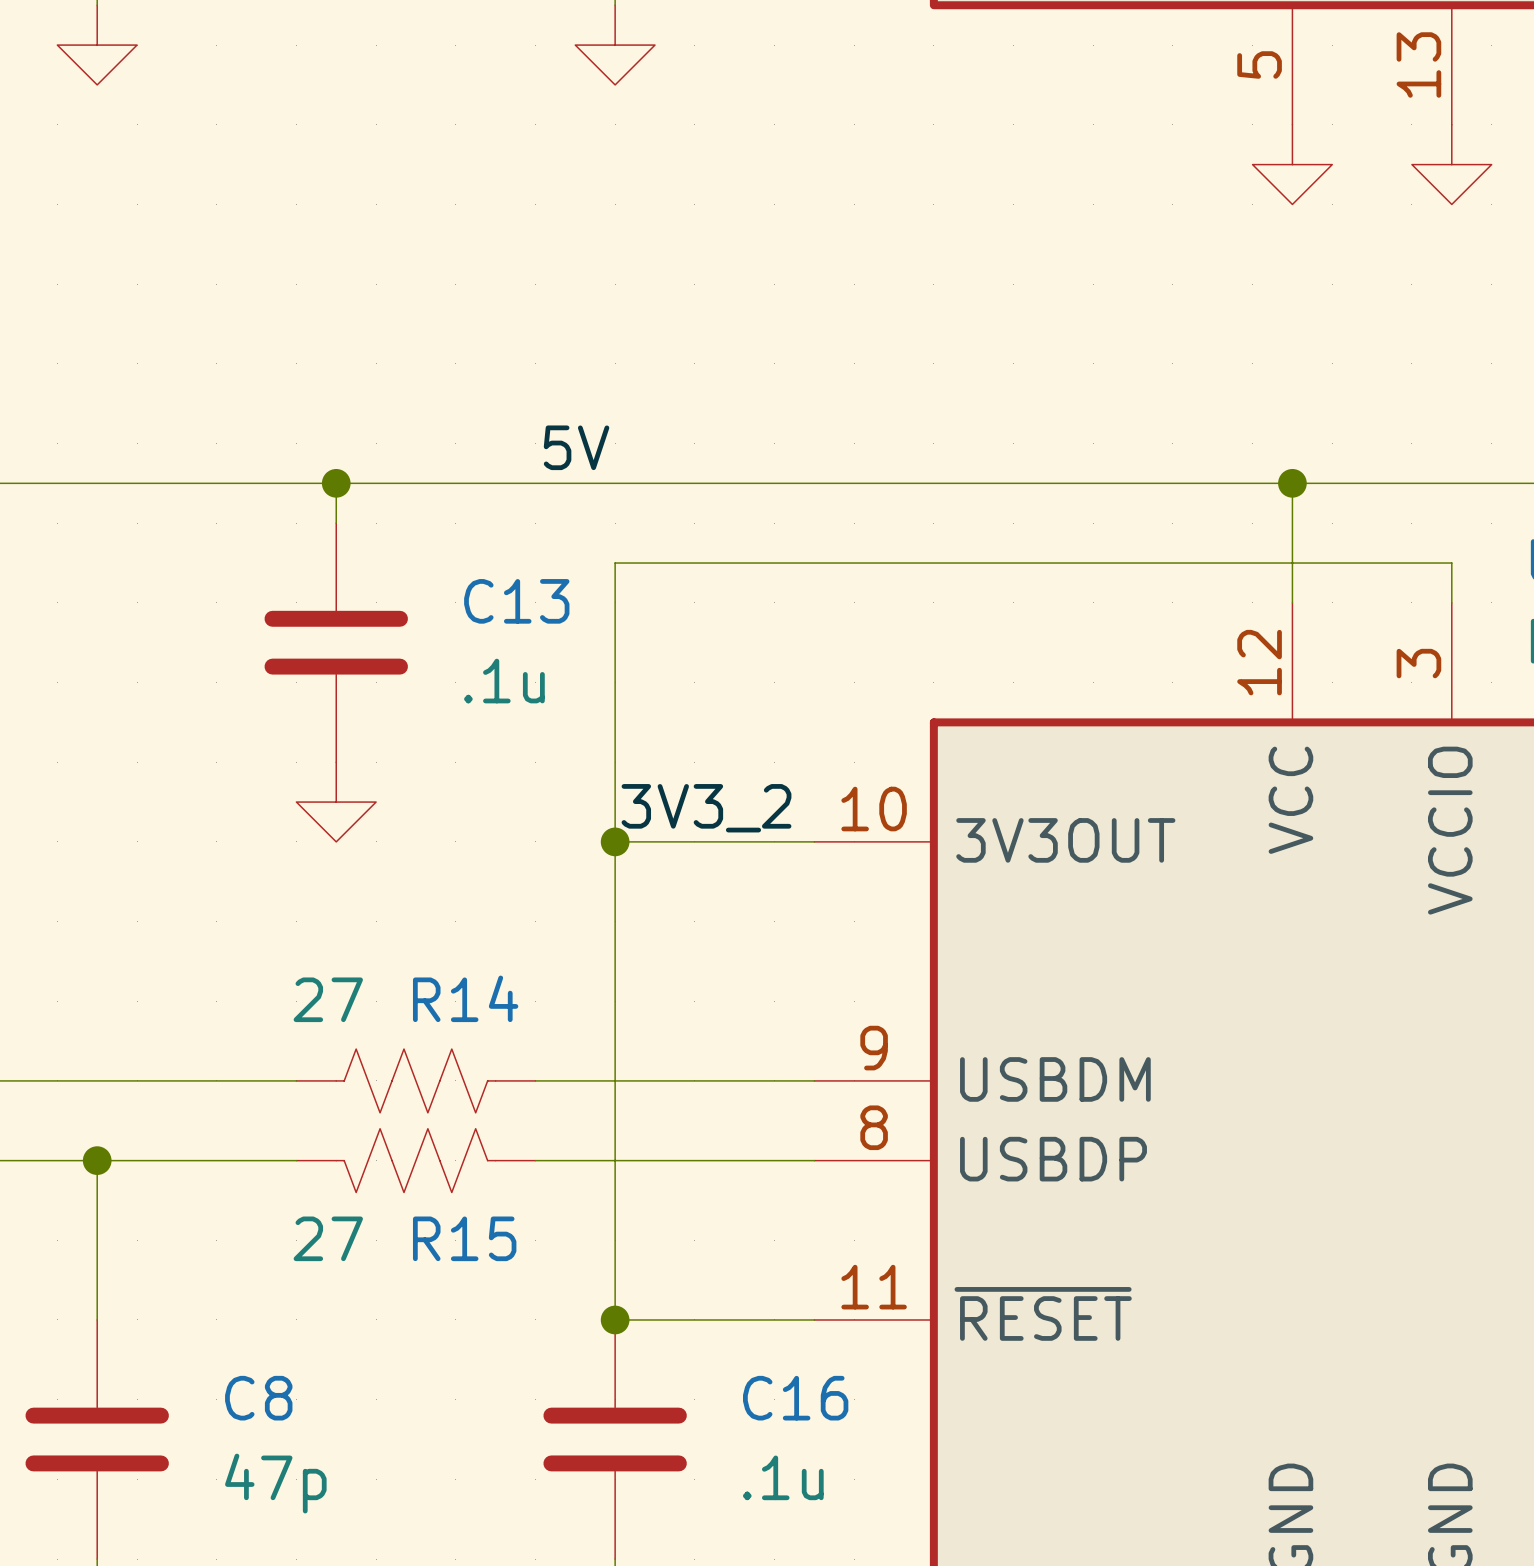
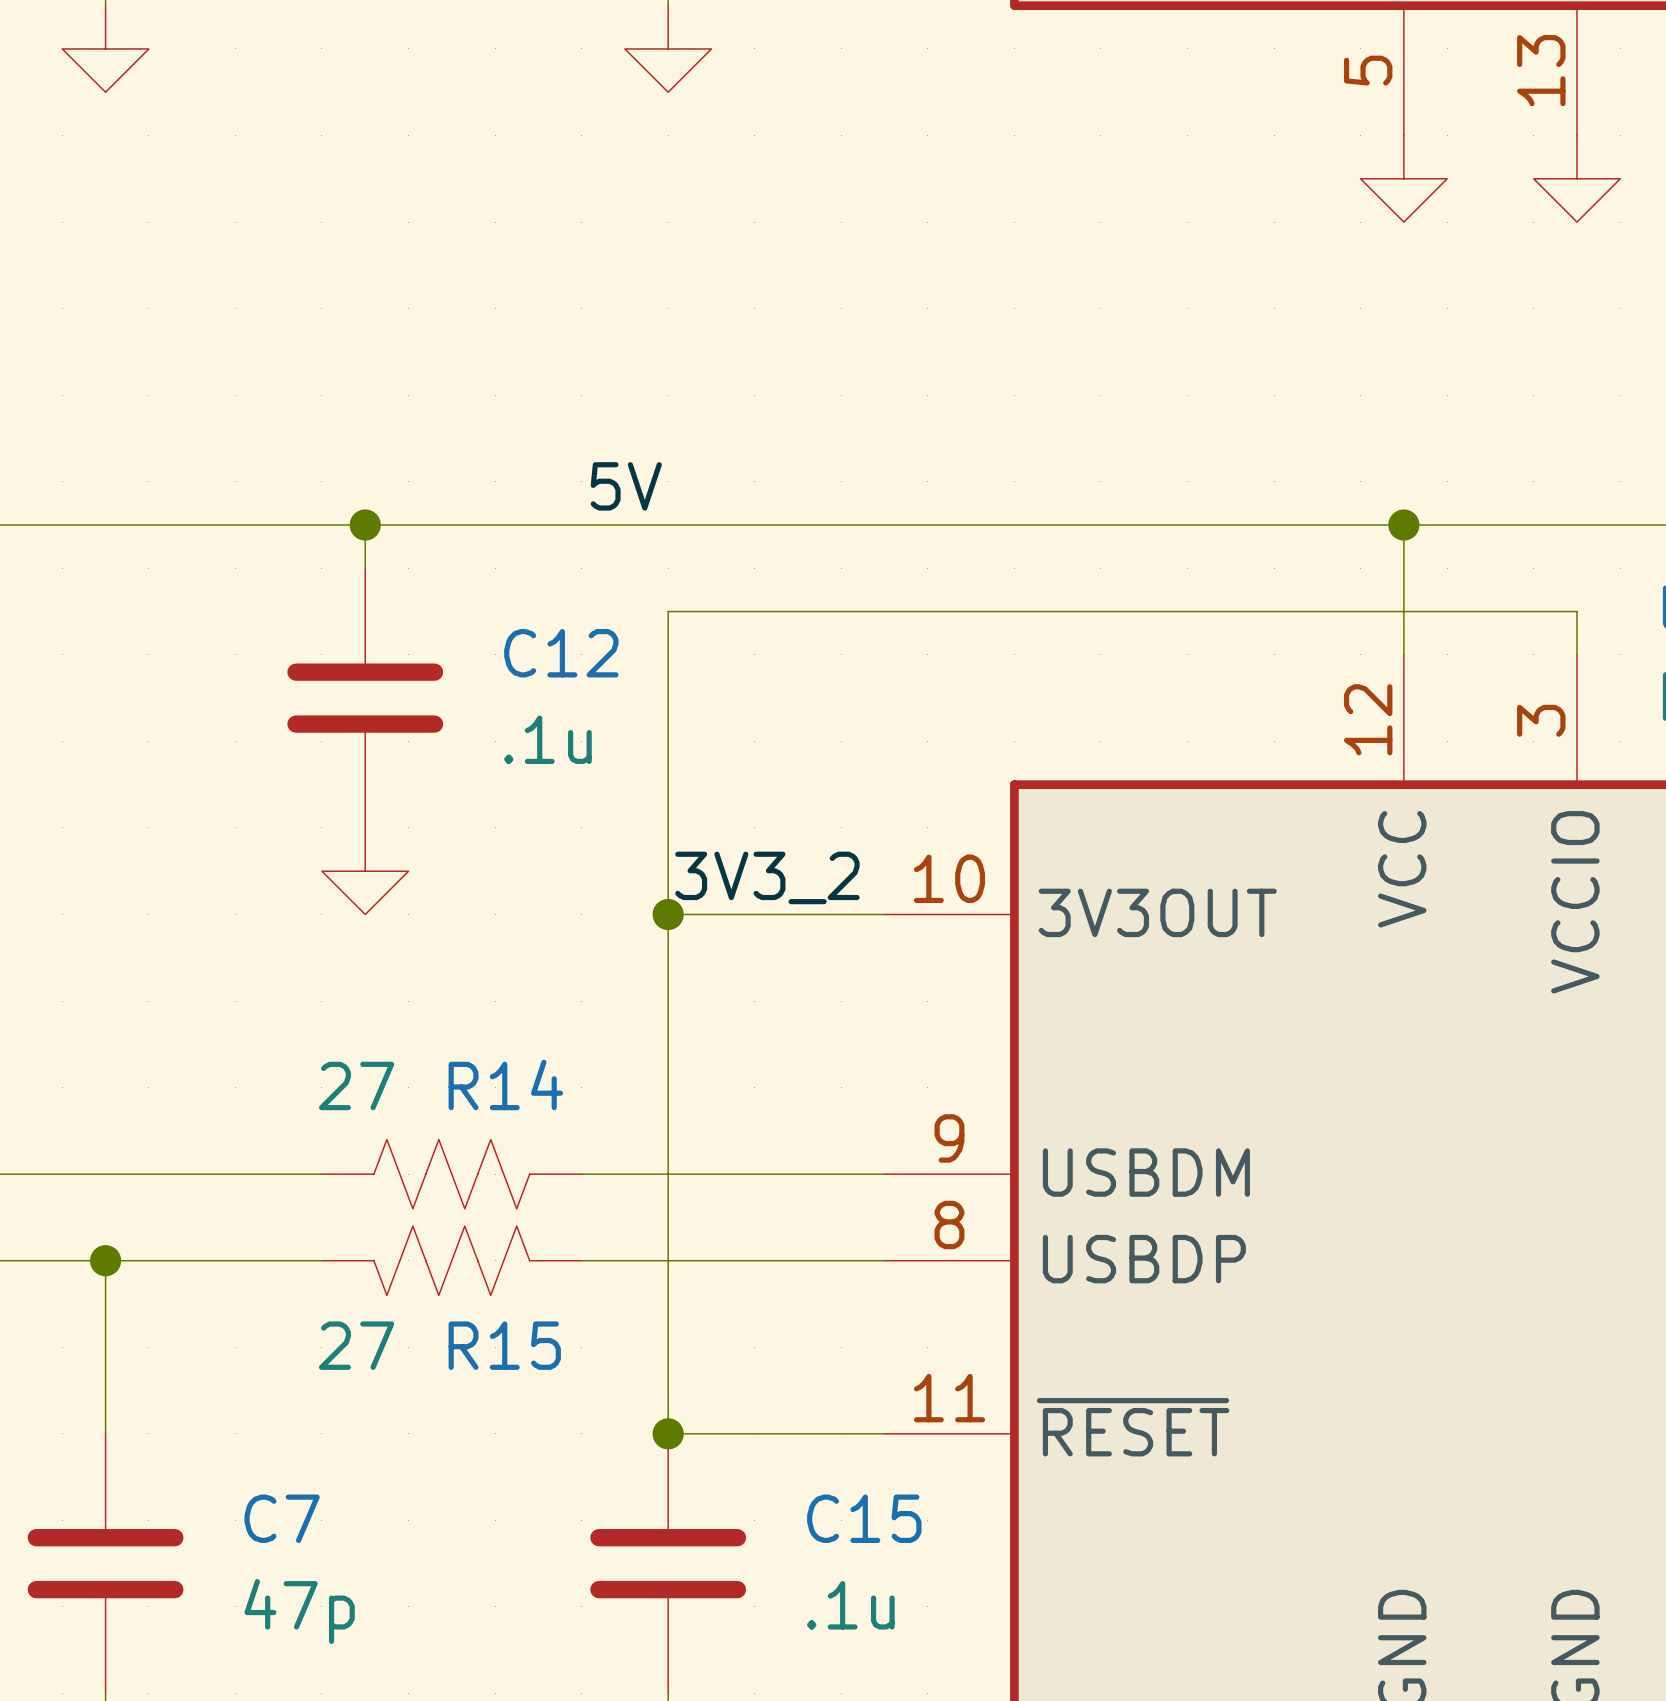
C13 name: C13 (516, 601) -> C12 (561, 653)
C8 name: C8 (258, 1398) -> C7 (282, 1518)
C16 name: C16 (795, 1398) -> C15 (864, 1518)

